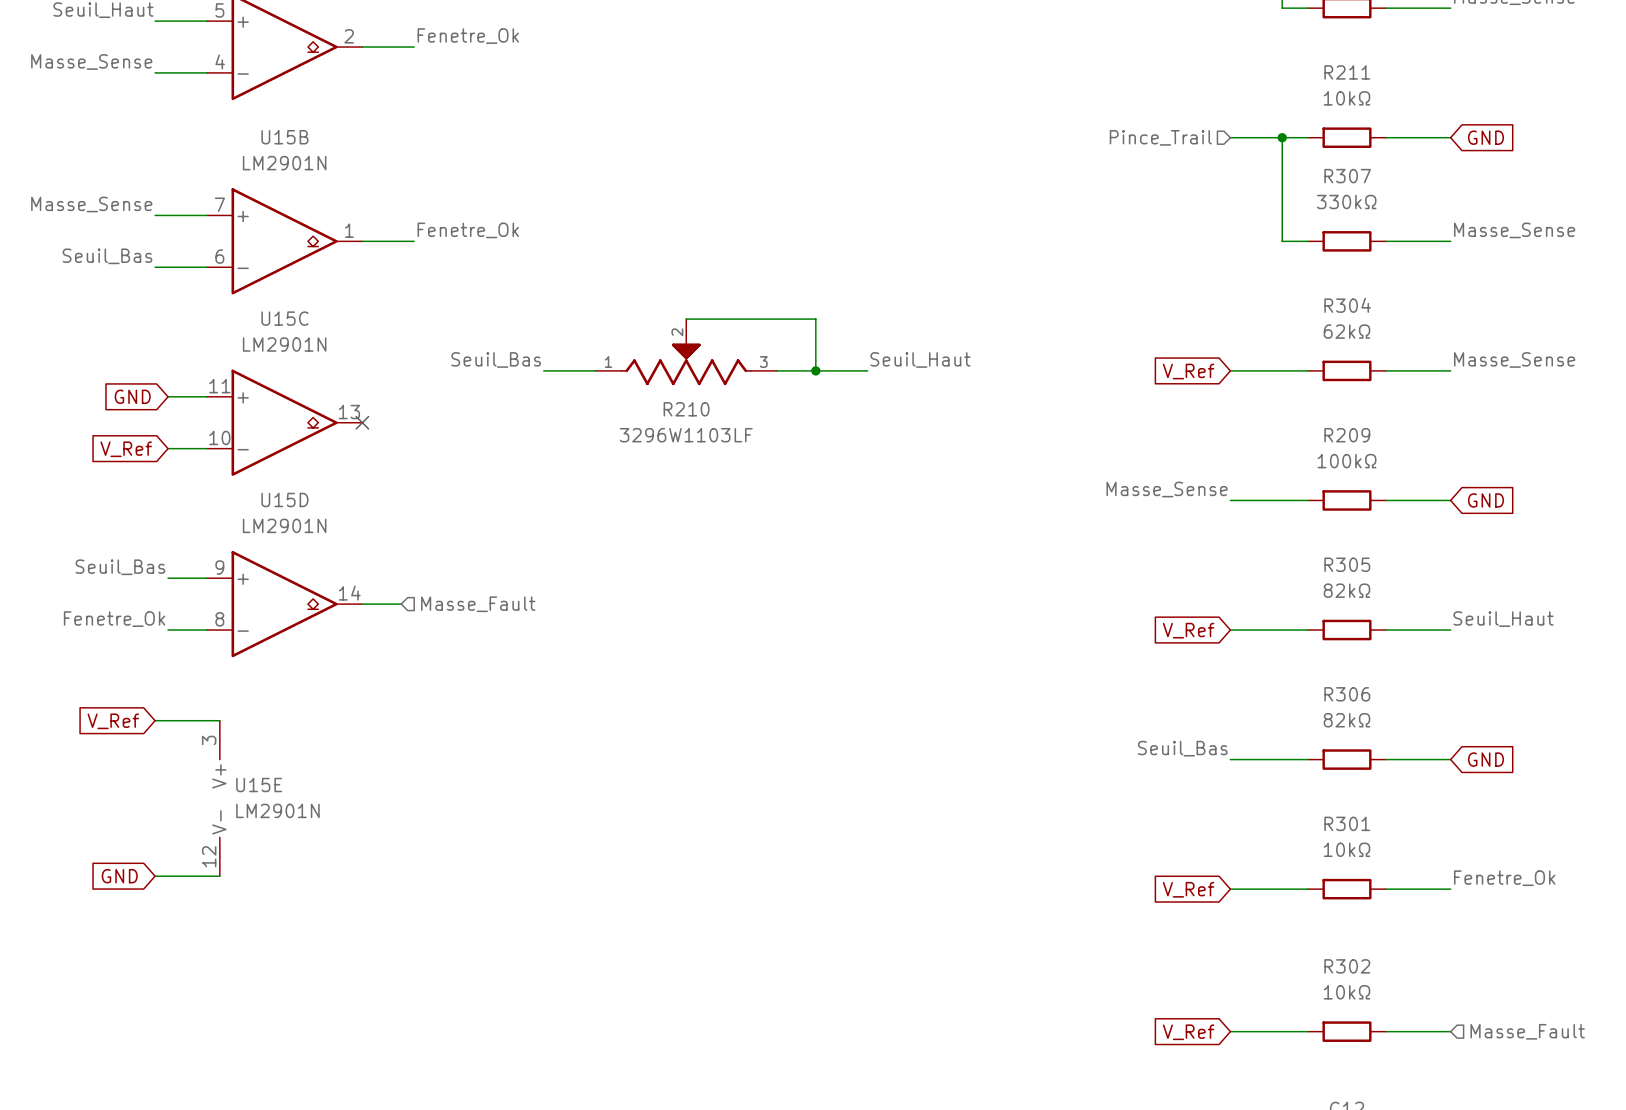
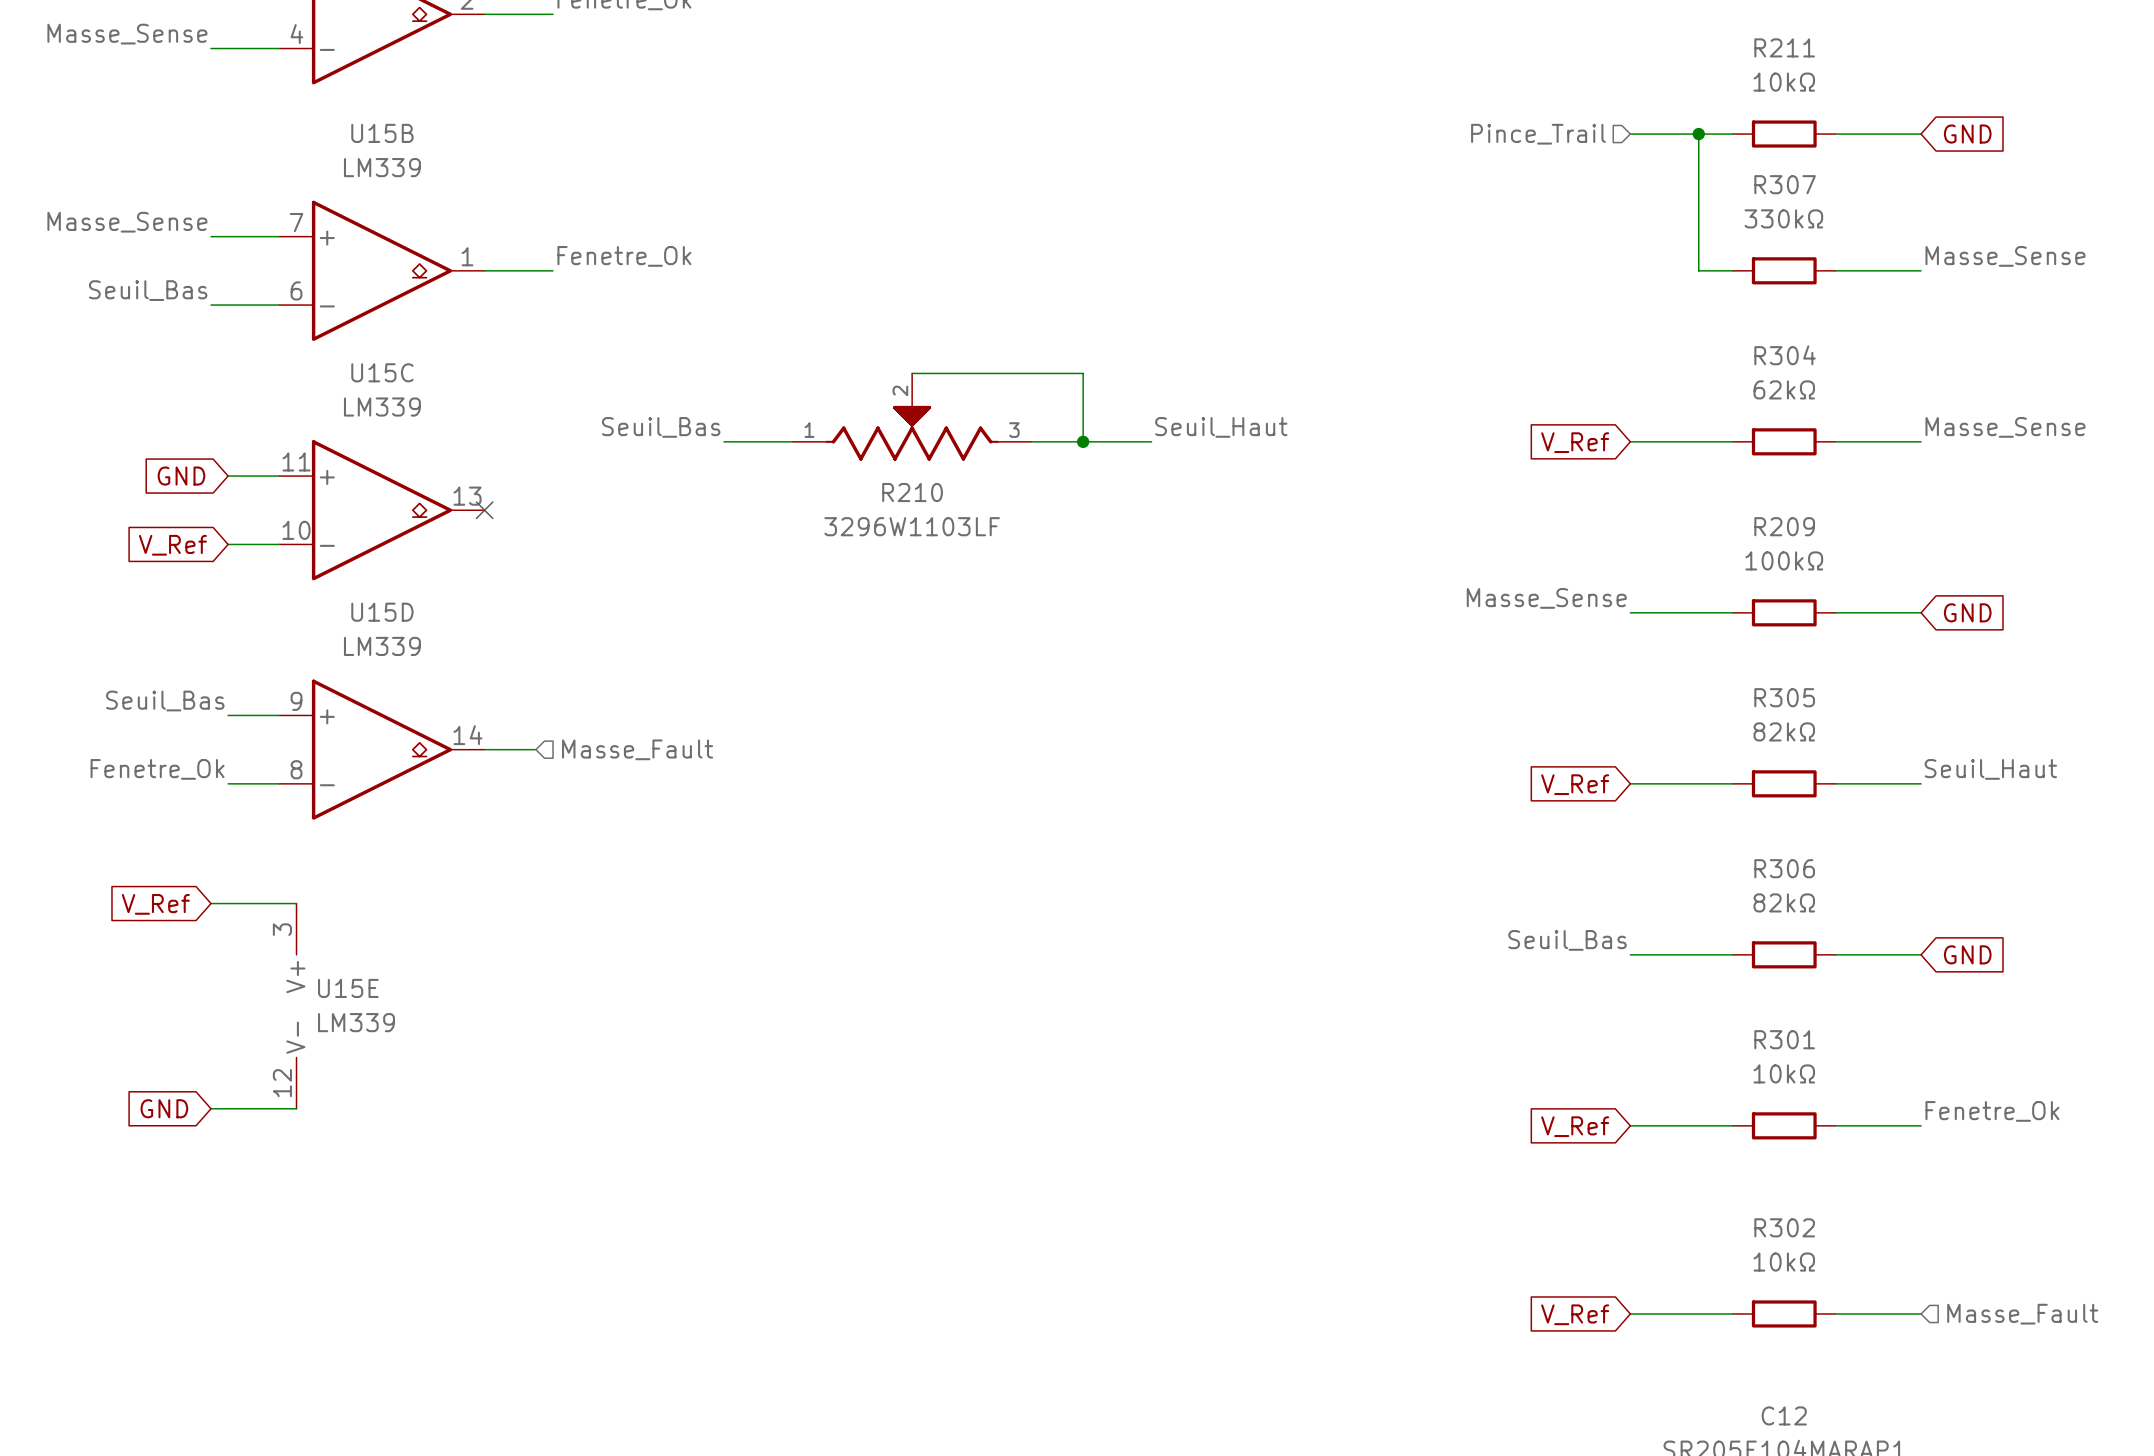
U15B value: LM2901N (284, 163) -> LM339 (382, 167)
U15C value: LM2901N (284, 344) -> LM339 (382, 407)
U15D value: LM2901N (284, 525) -> LM339 (382, 646)
U15E value: LM2901N (277, 810) -> LM339 (356, 1022)

